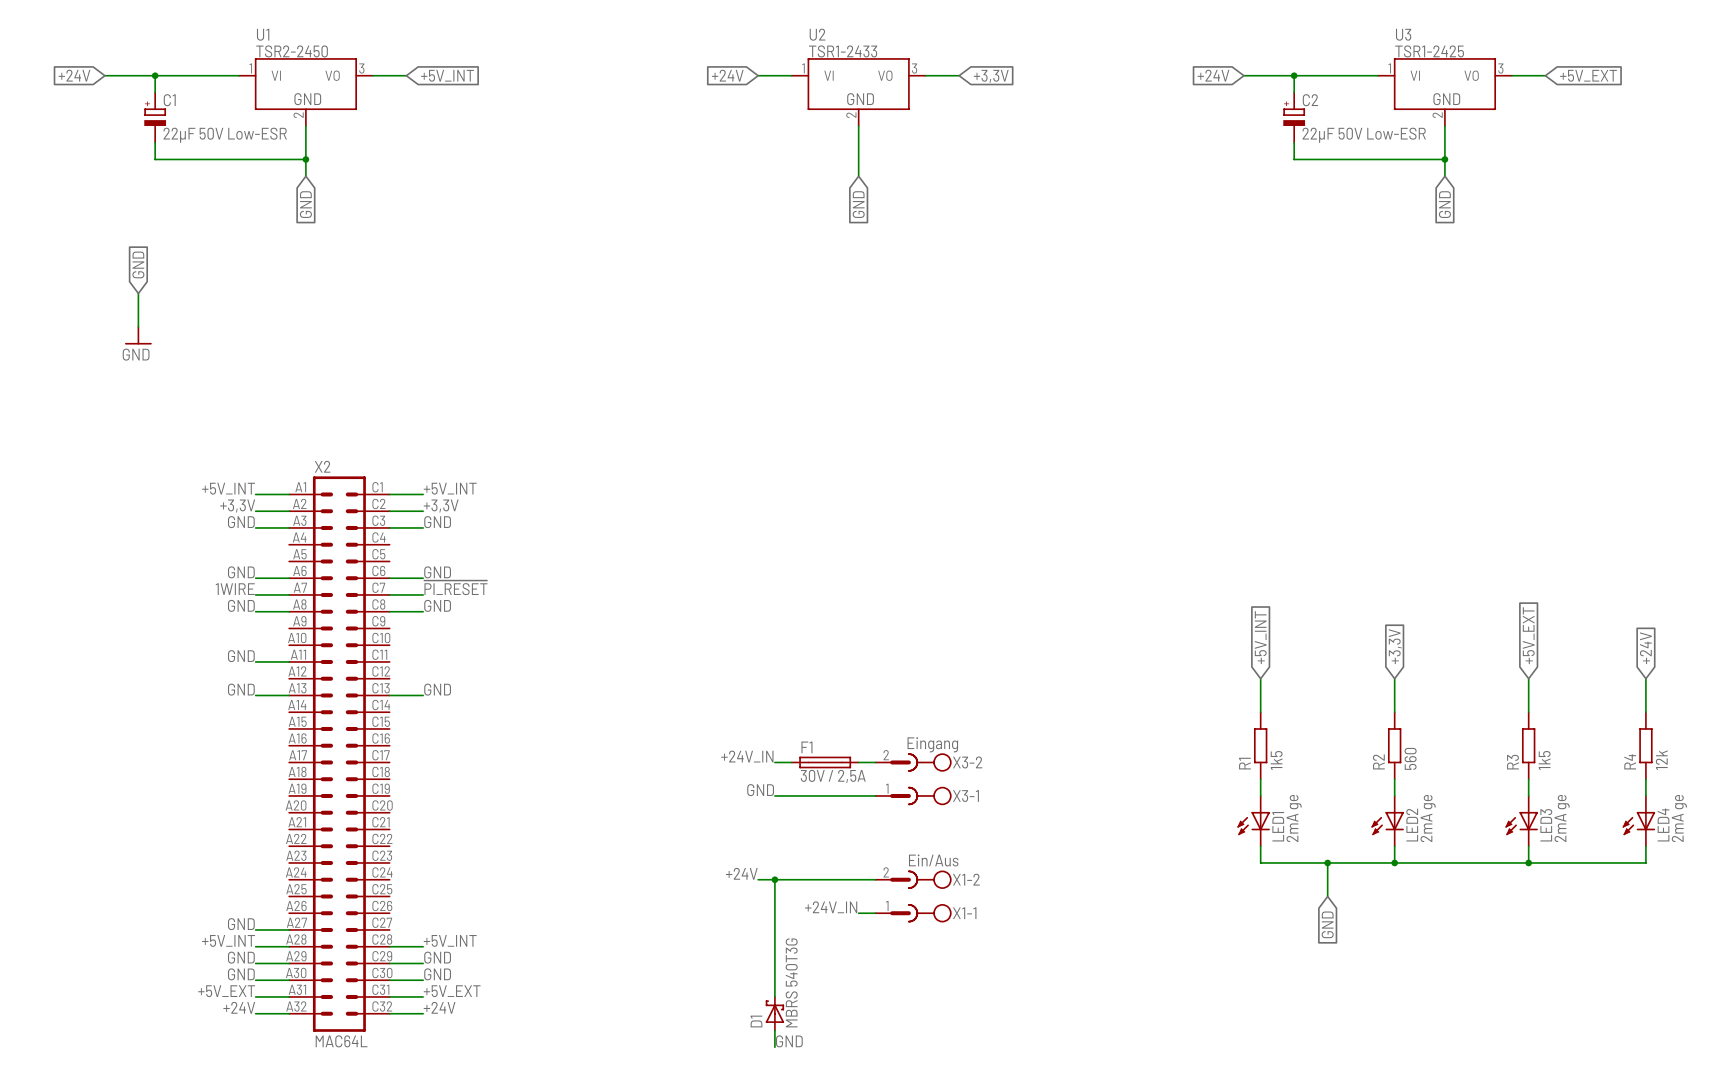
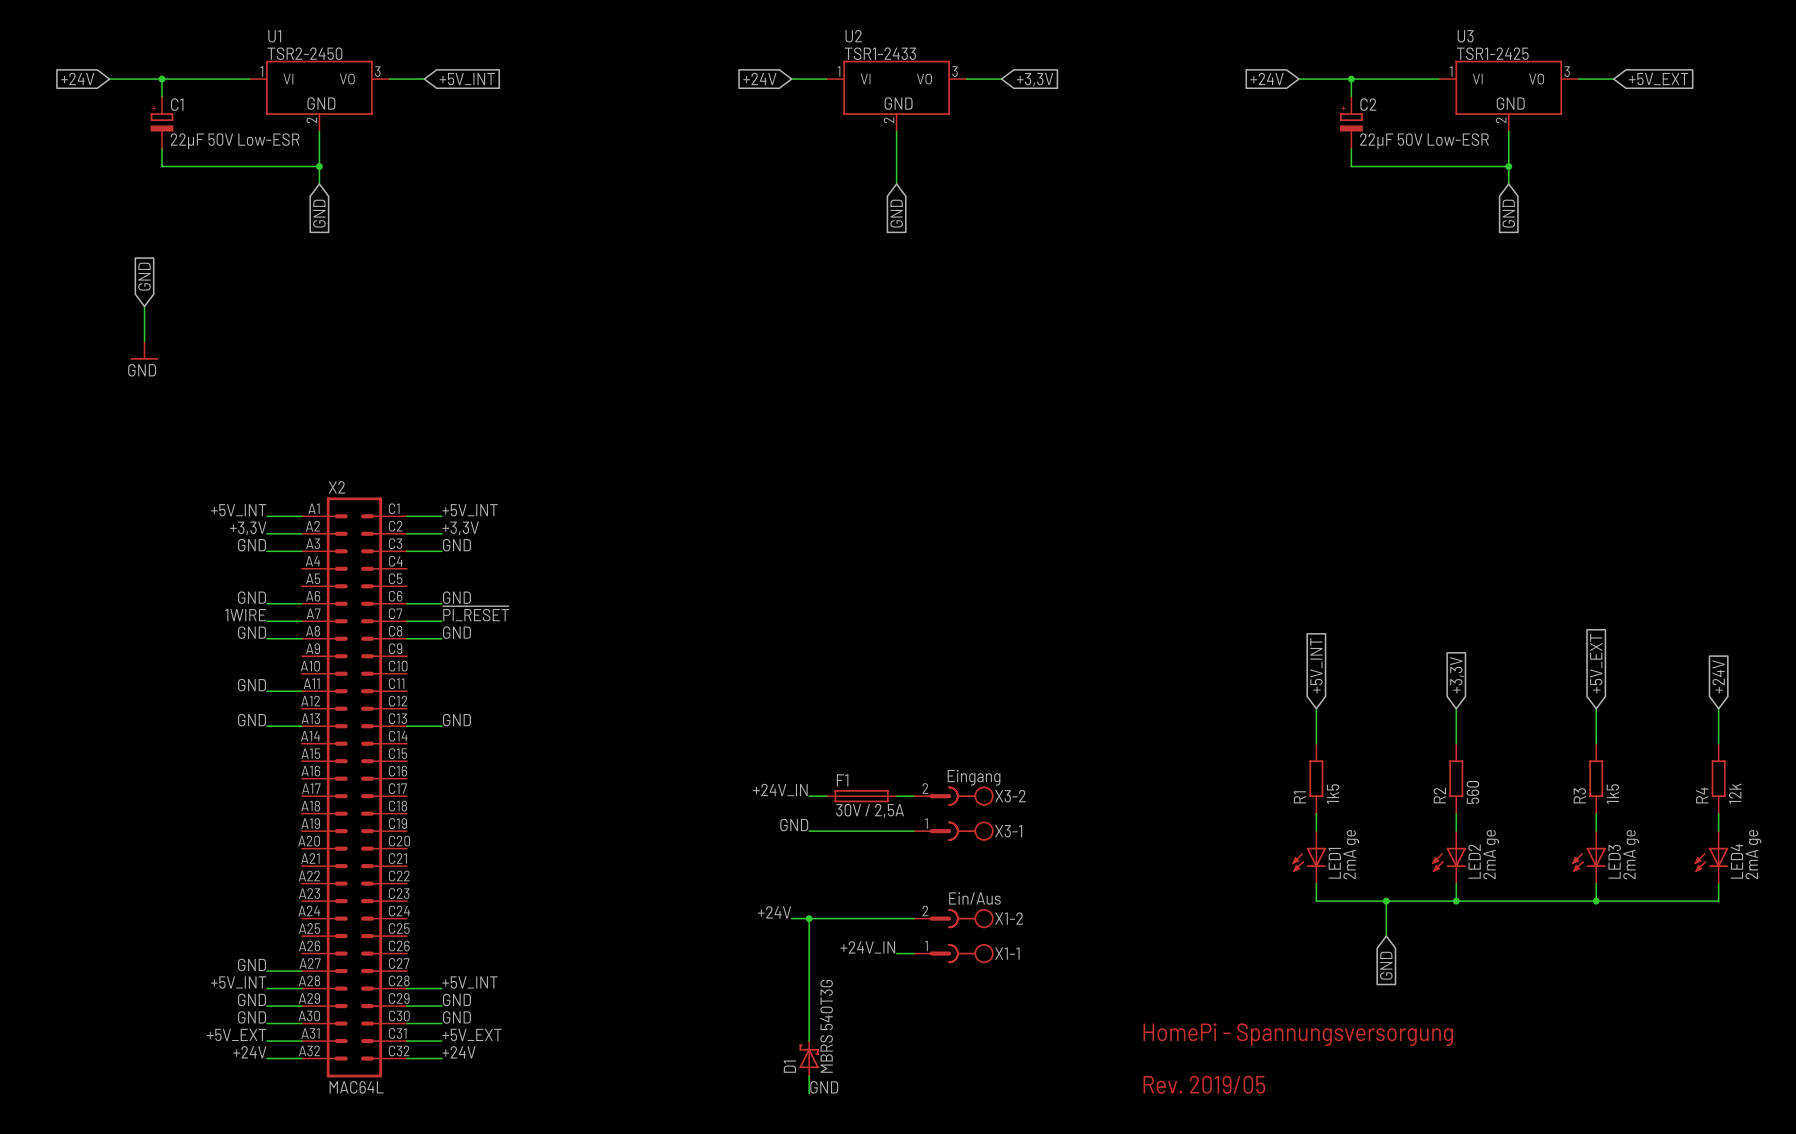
text: none -> HomePi - Spannungsversorgung (1298, 1034)
text: none -> Rev. 2019/05 (1204, 1084)

